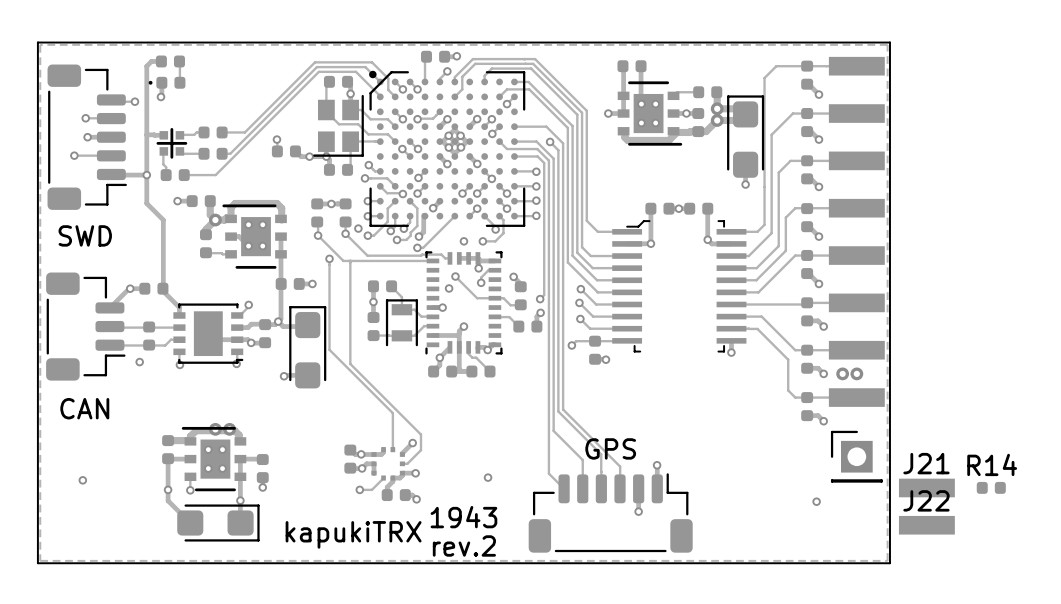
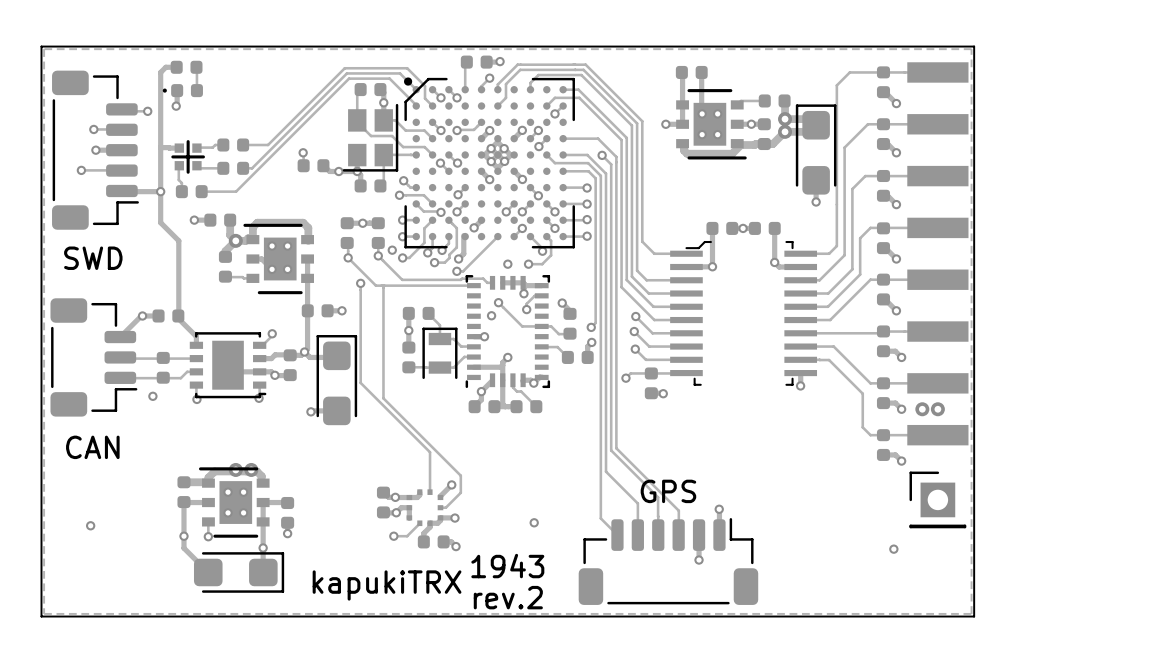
J21: (926, 487) -> none
R14: (991, 487) -> none
J22: (926, 525) -> none

